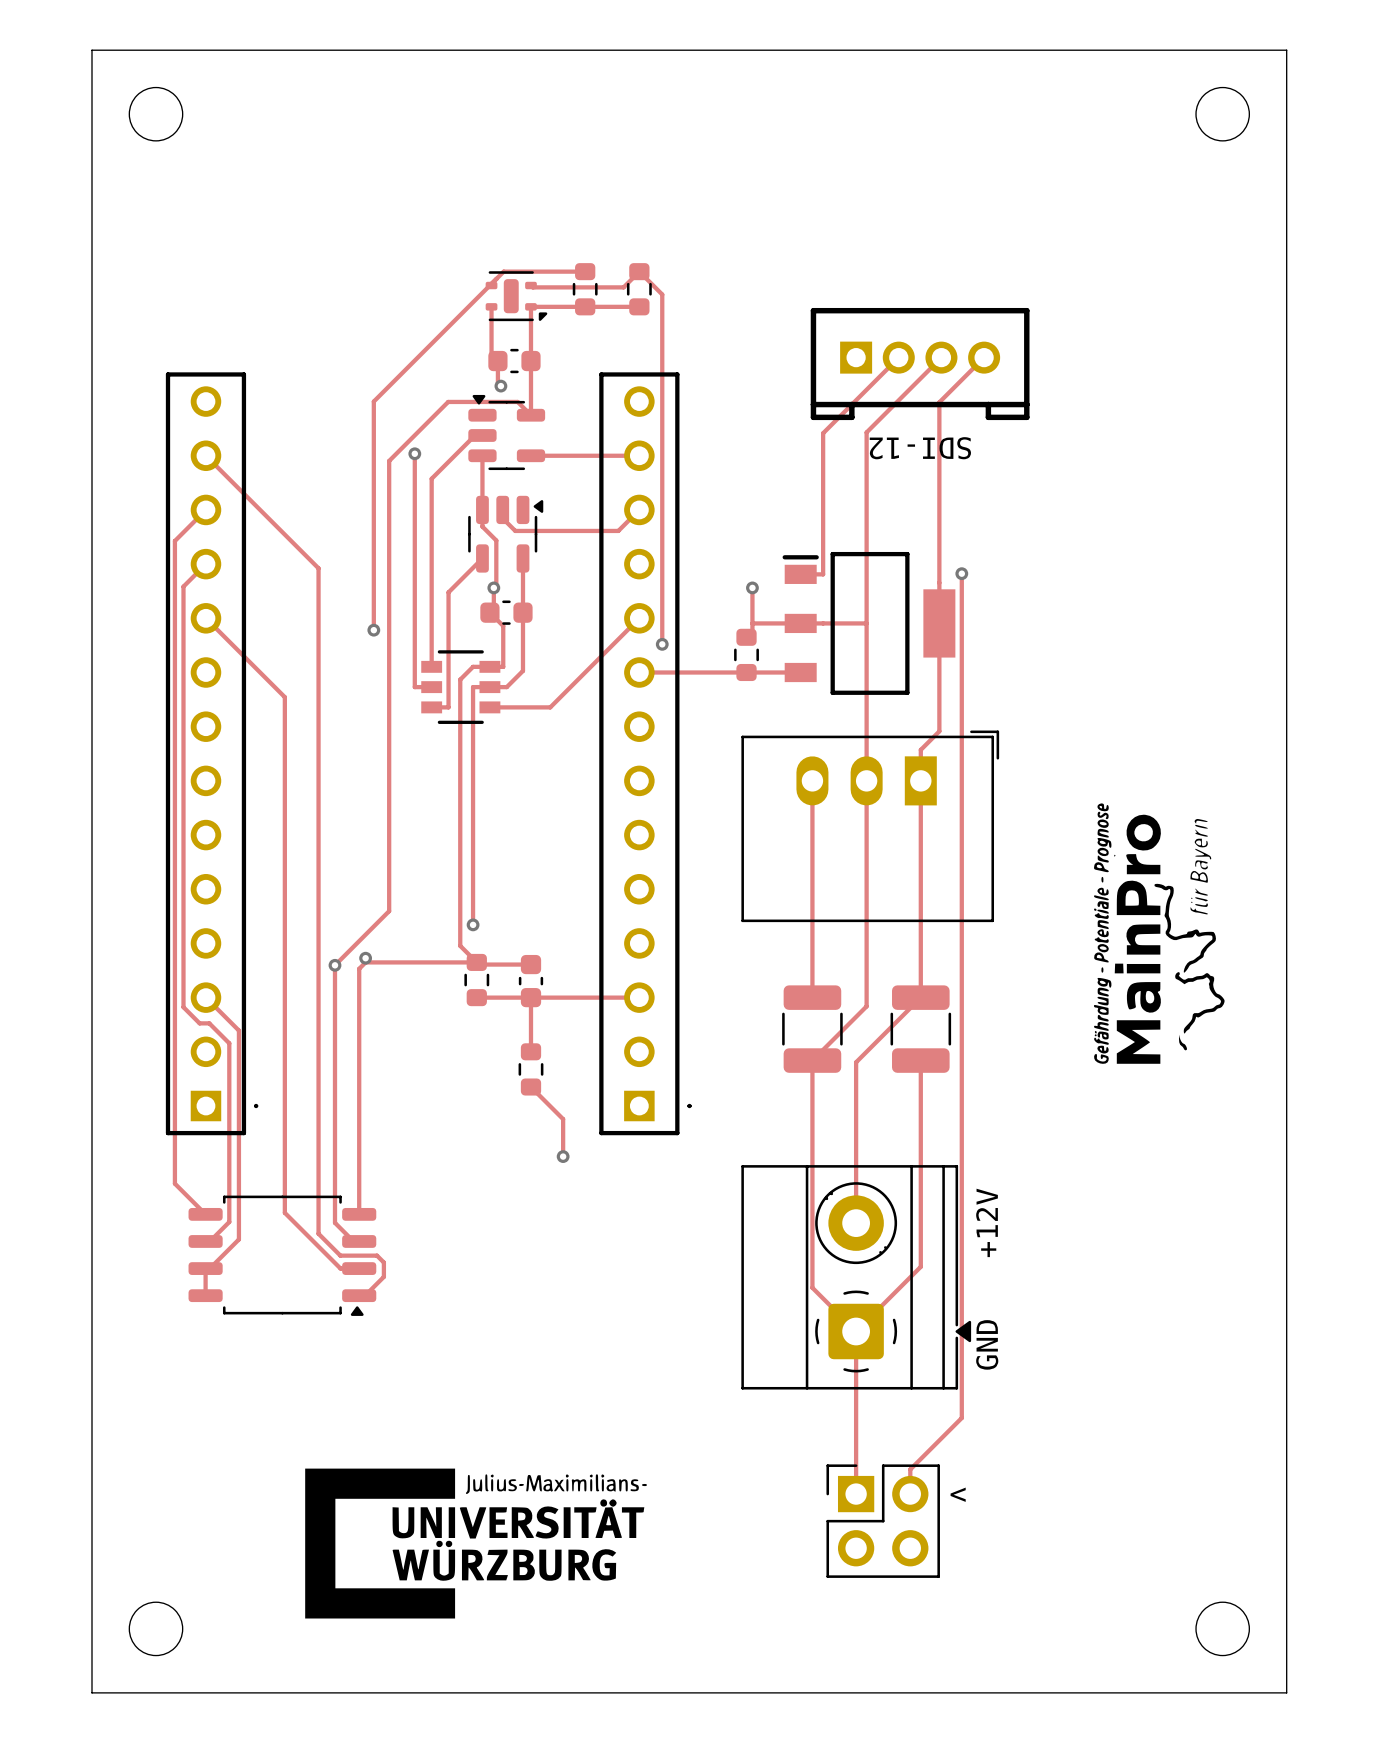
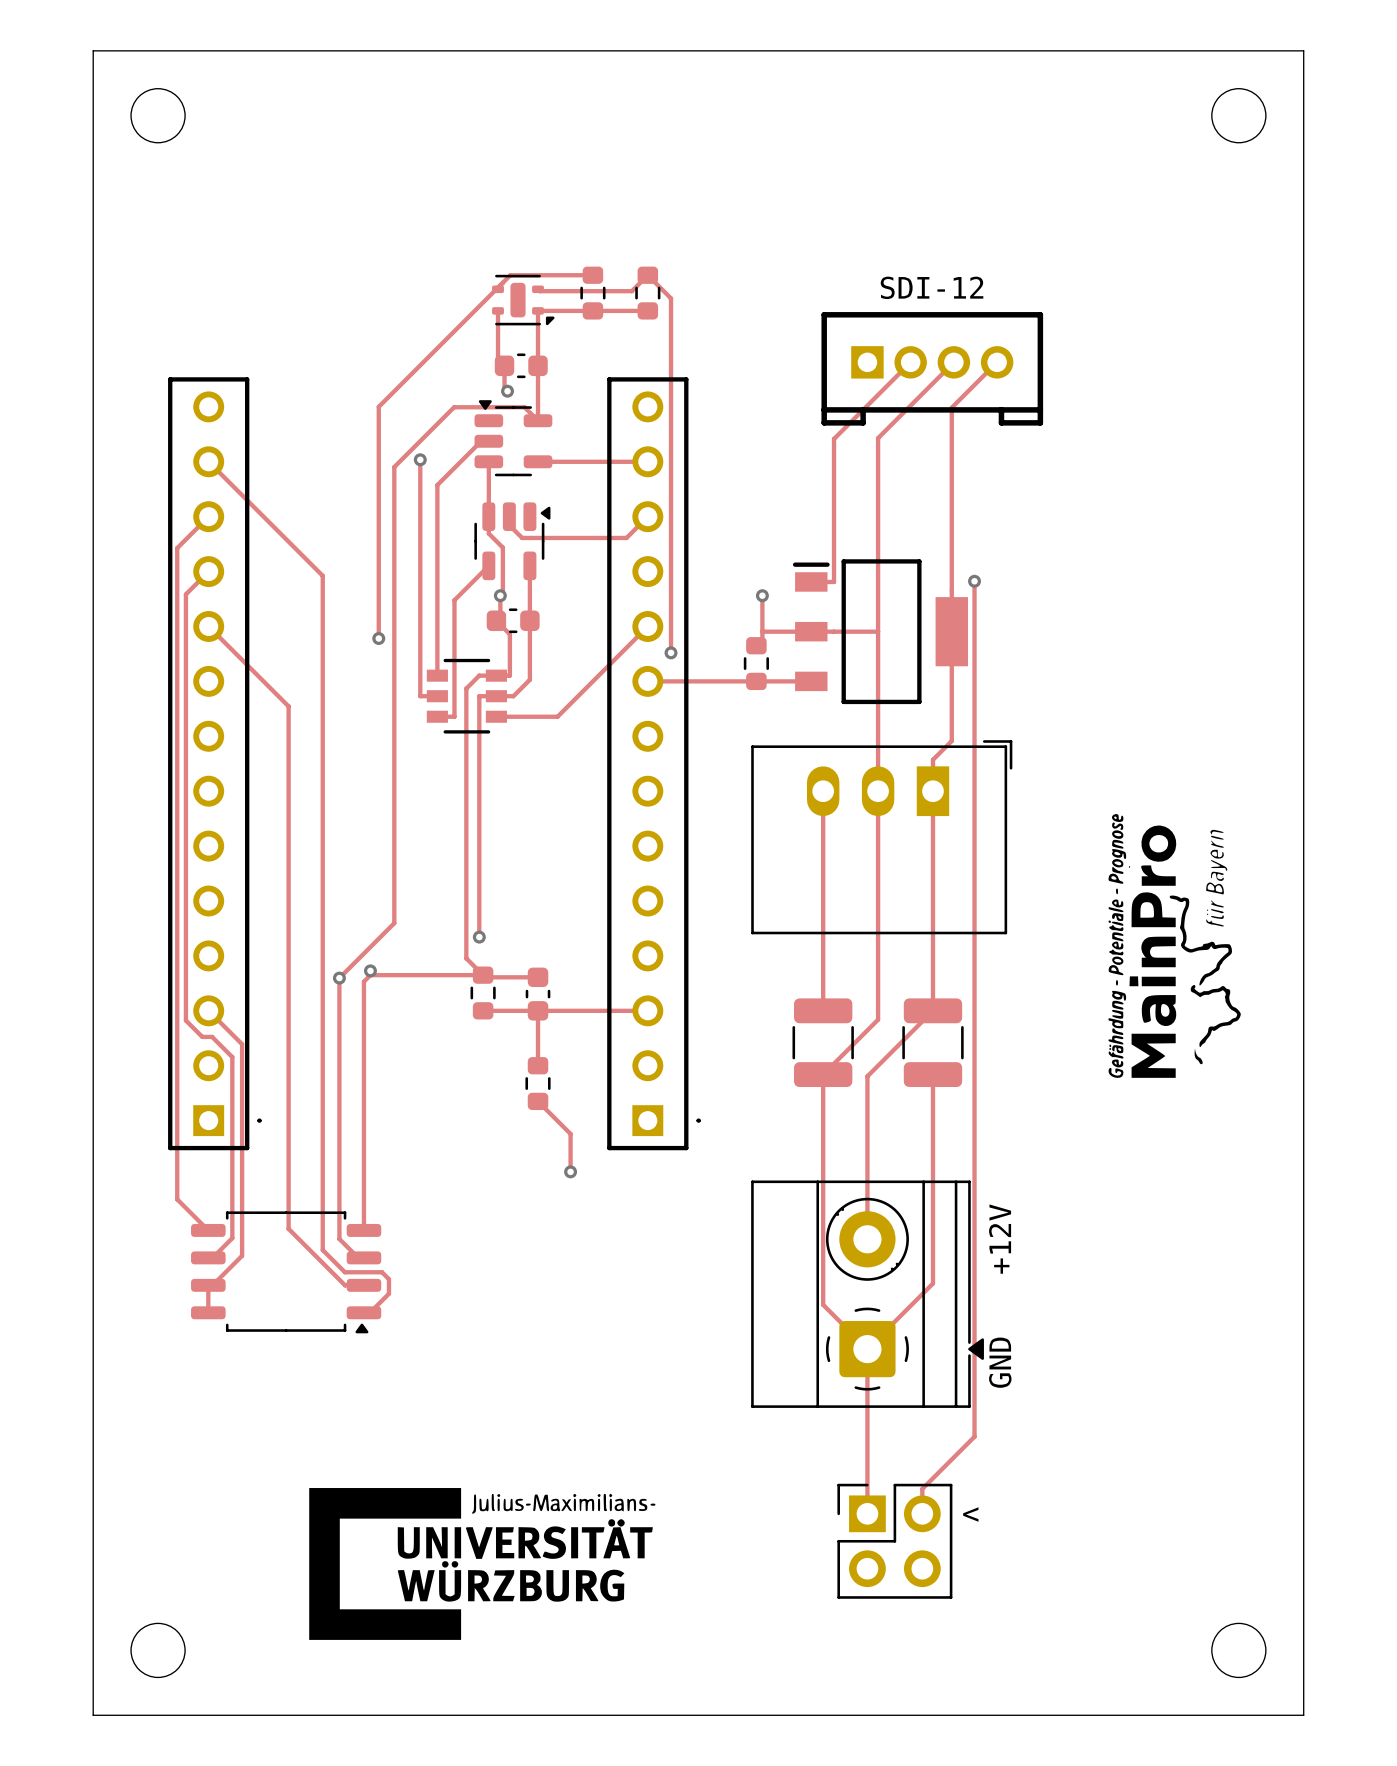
text rotation: 0° (920, 448) -> 180° (932, 287)
text position: SDI-12 (920, 448) -> SDI-12 (932, 287)

